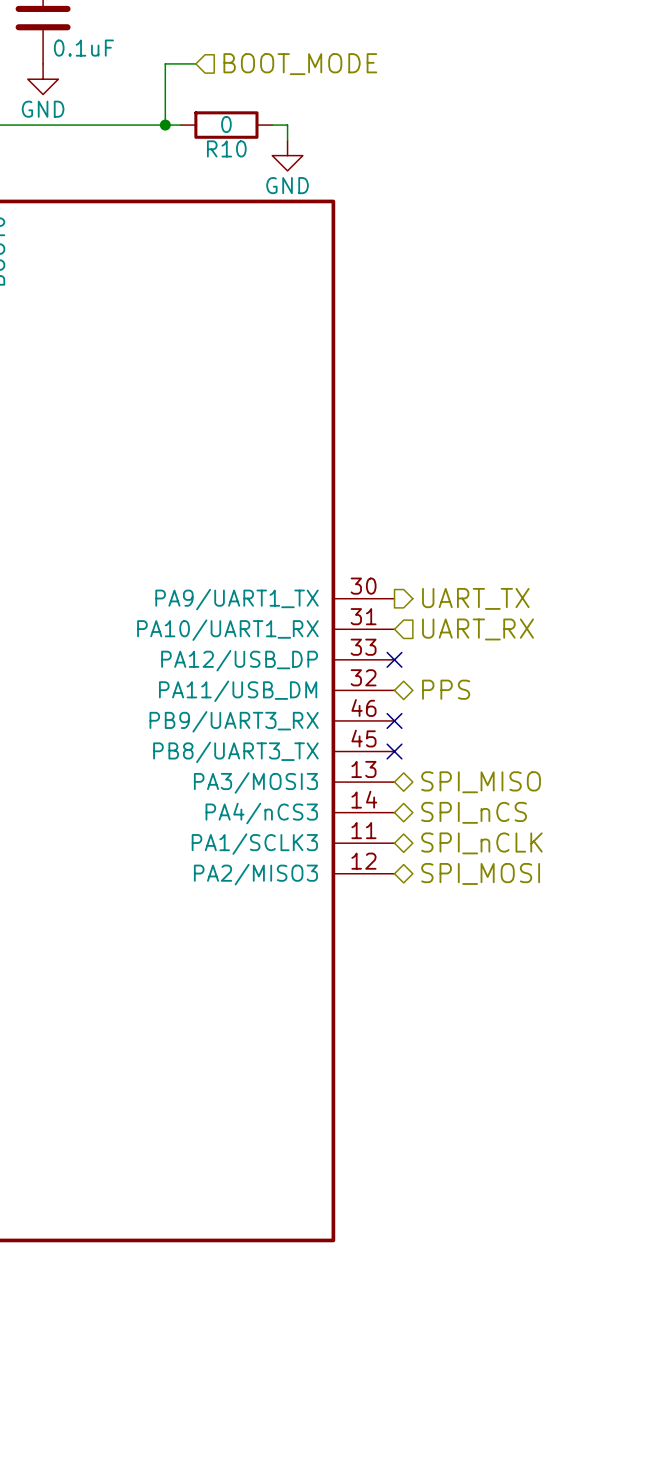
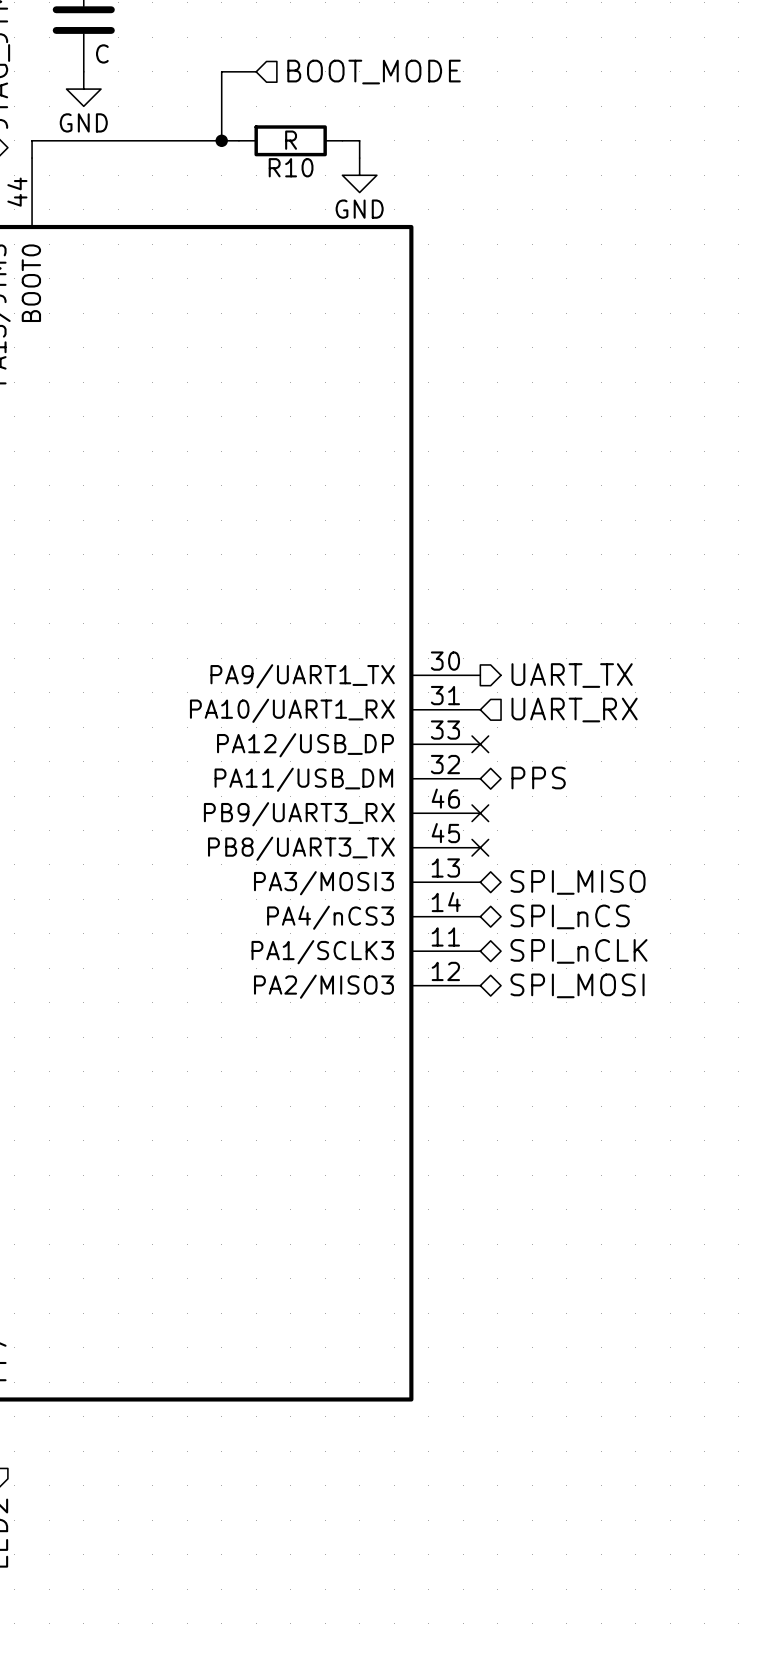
part value: 0.1uF (83, 48) -> C (102, 53)
R10 value: 0 (226, 124) -> R (291, 140)

